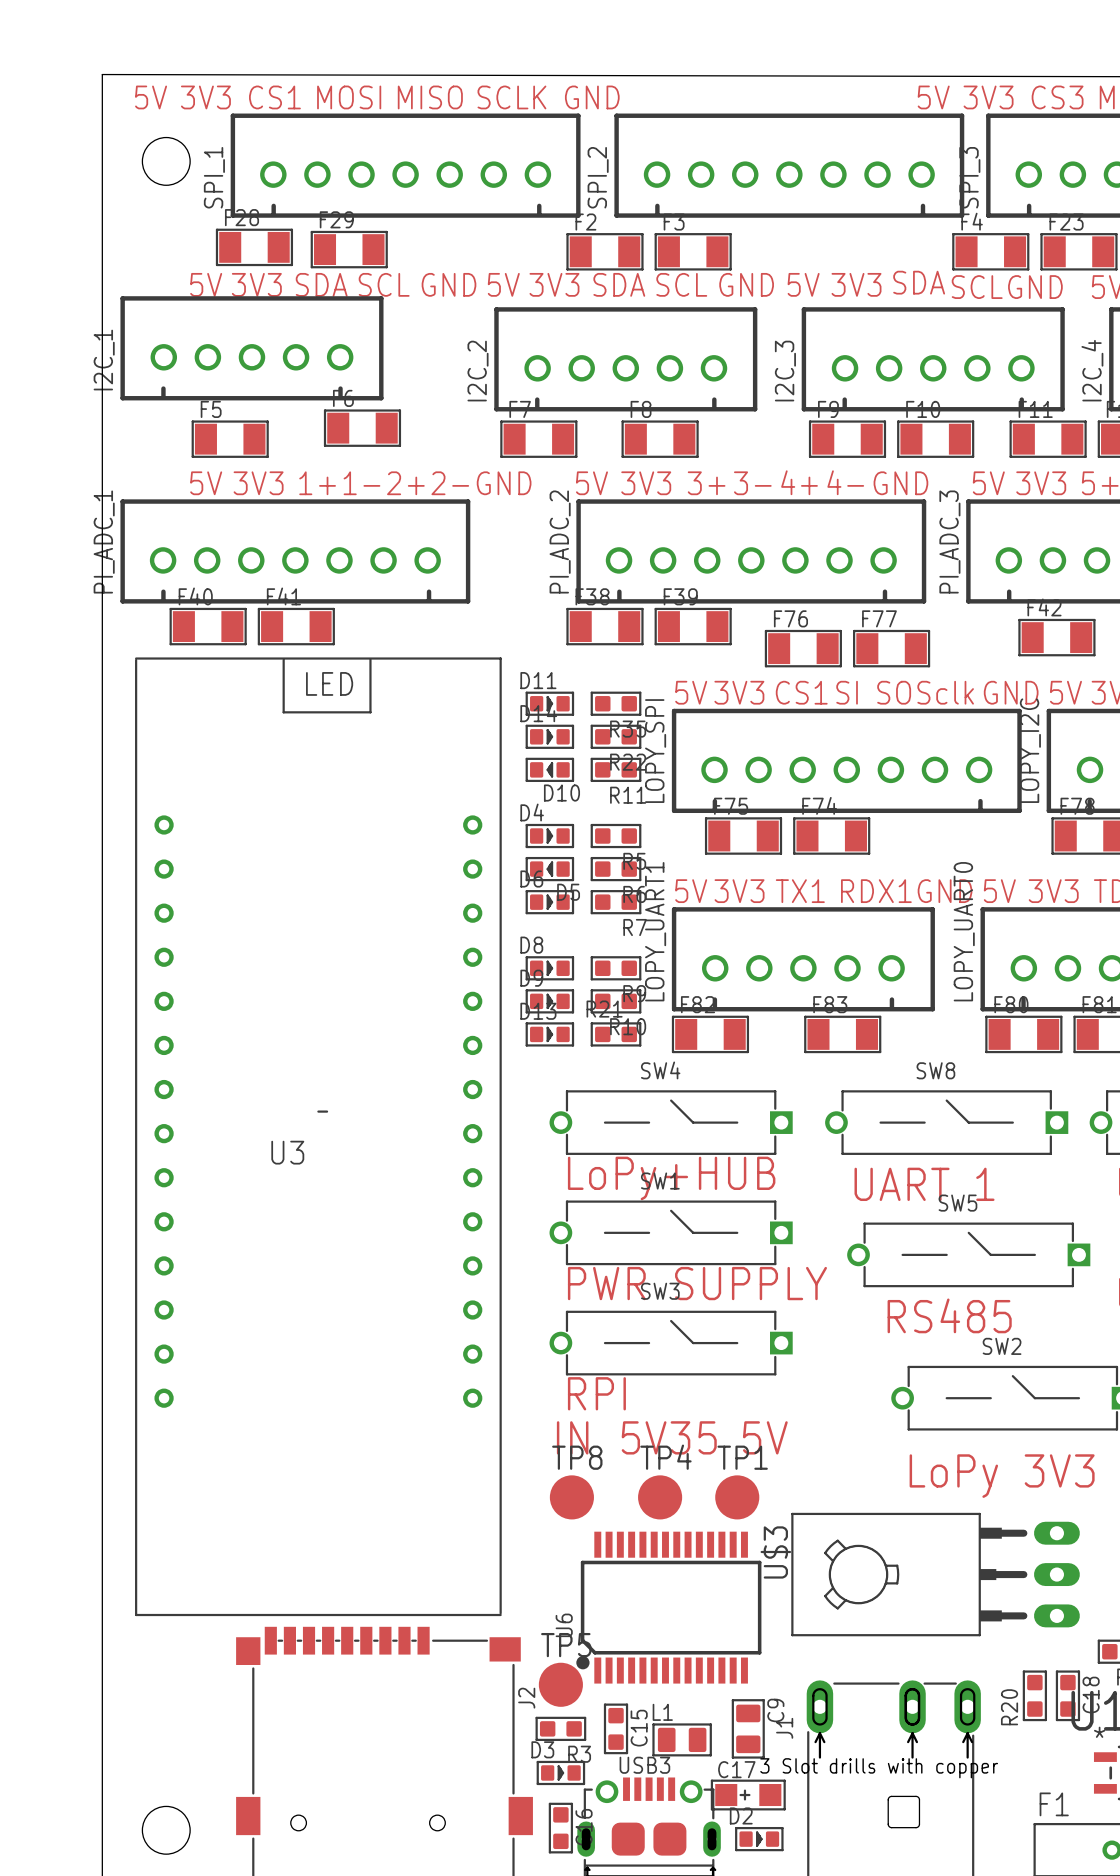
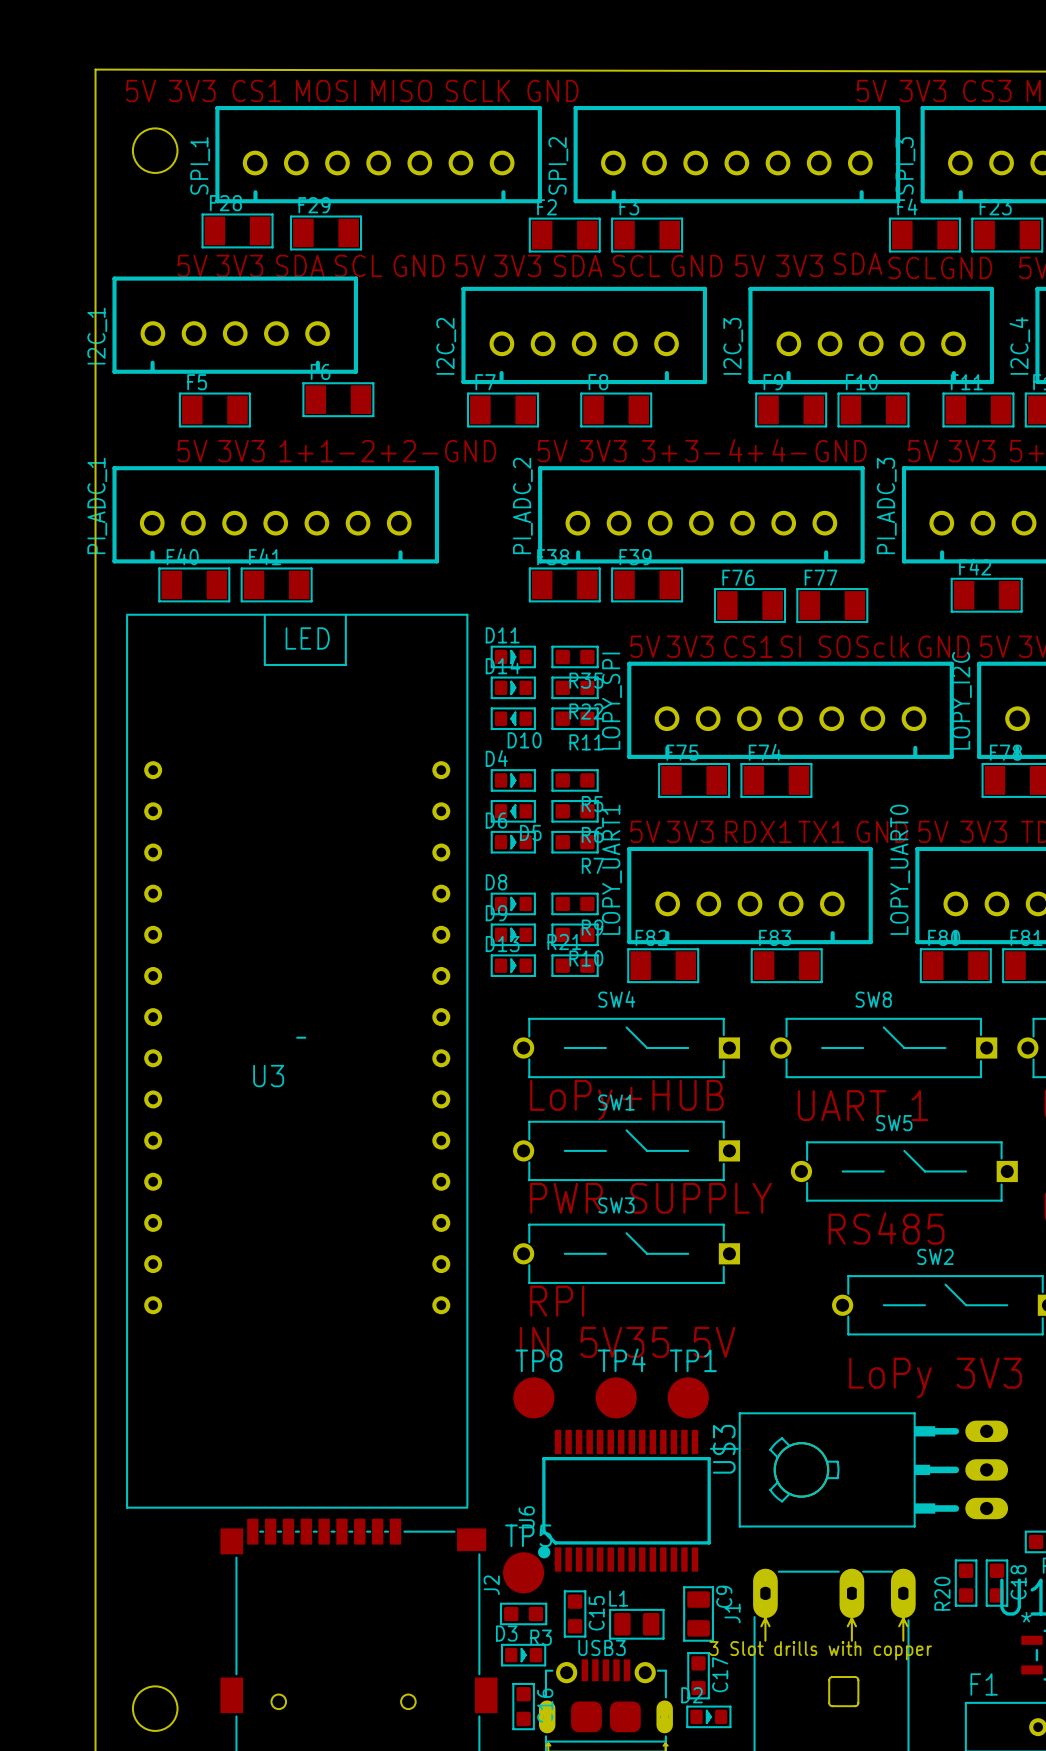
text: TX1 (800, 891) -> RDX1 (758, 831)
text: RDX1 (876, 891) -> TX1 (821, 831)
C17 name position: C17 (736, 1769) -> C17 (720, 1674)
C17 footprint: [710, 1779, 786, 1811] -> [687, 1652, 710, 1700]

